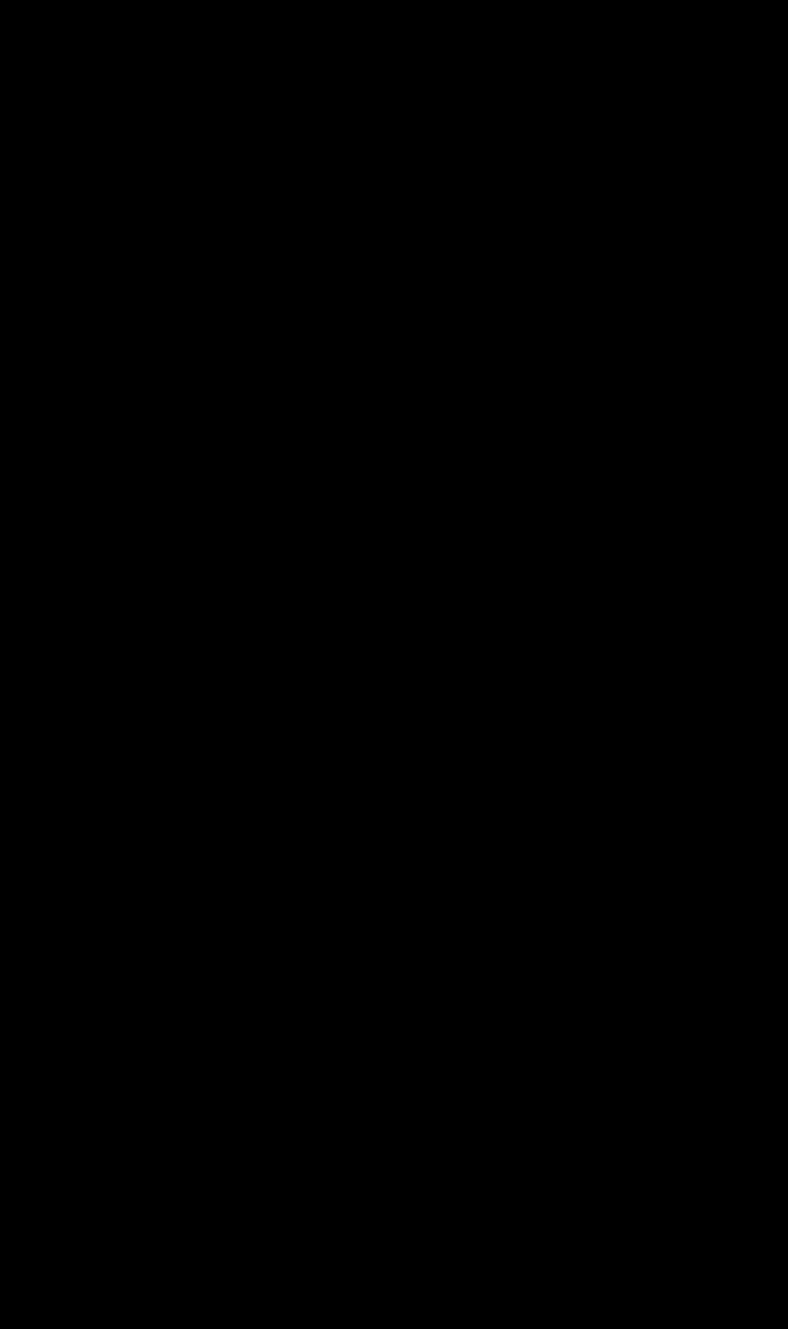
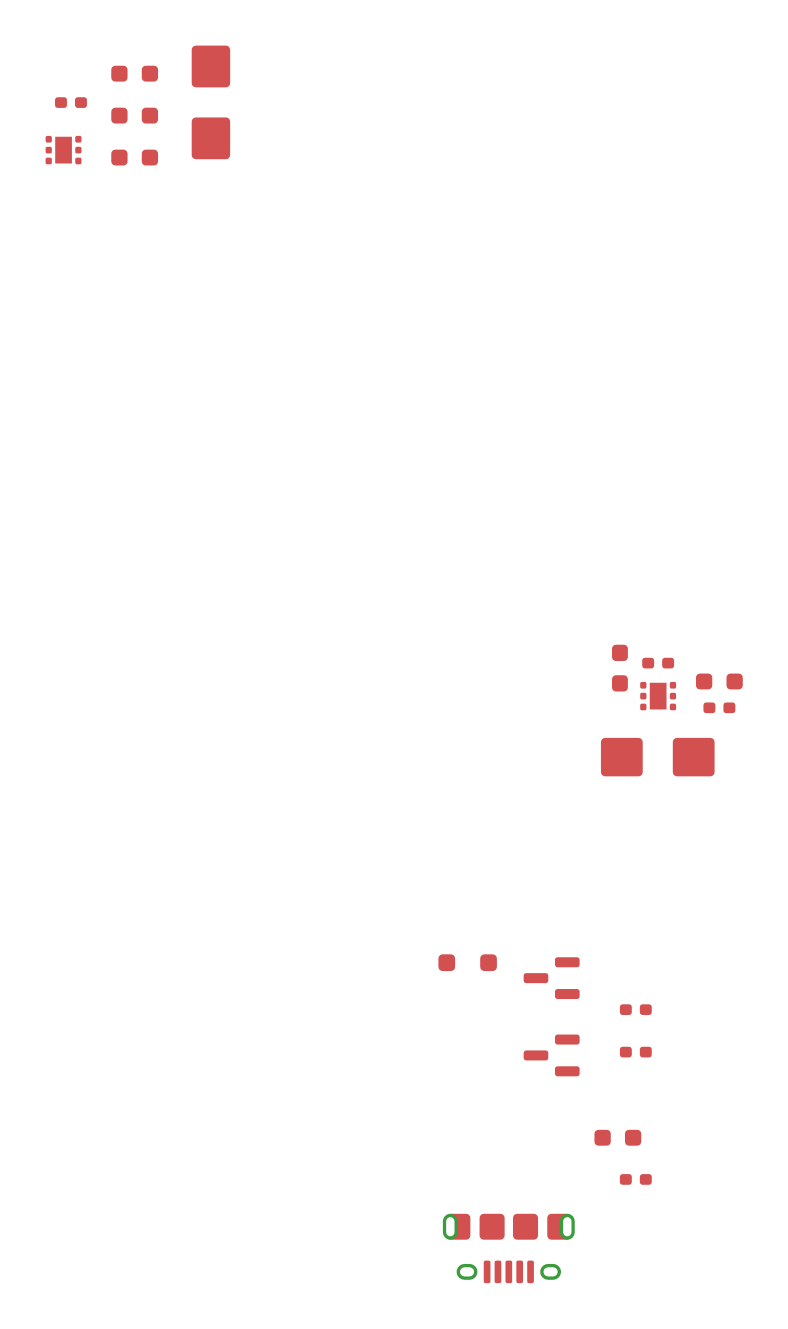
part: none -> (134, 73)
part: none -> (70, 102)
part: none -> (210, 102)
part: none -> (134, 115)
part: none -> (63, 150)
part: none -> (134, 157)
part: none -> (658, 663)
part: none -> (619, 668)
part: none -> (719, 681)
part: none -> (658, 696)
part: none -> (719, 707)
part: none -> (657, 757)
part: none -> (467, 962)
part: none -> (551, 978)
part: none -> (635, 1009)
part: none -> (635, 1052)
part: none -> (551, 1055)
part: none -> (617, 1137)
part: none -> (635, 1179)
part: none -> (508, 1248)

